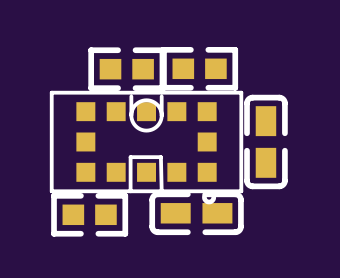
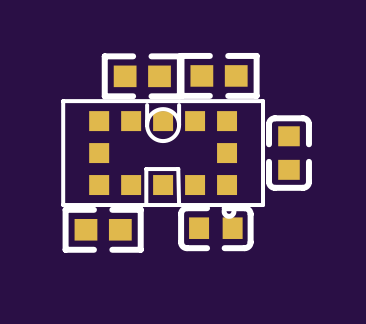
part footprint: [244, 94, 288, 190] -> [266, 115, 312, 191]
part footprint: [149, 191, 244, 236] -> [178, 205, 254, 252]

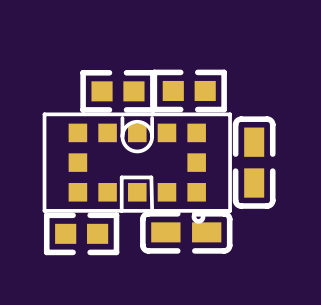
part footprint: [266, 115, 312, 191] -> [232, 116, 276, 209]
part footprint: [178, 205, 254, 252] -> [140, 211, 233, 254]

